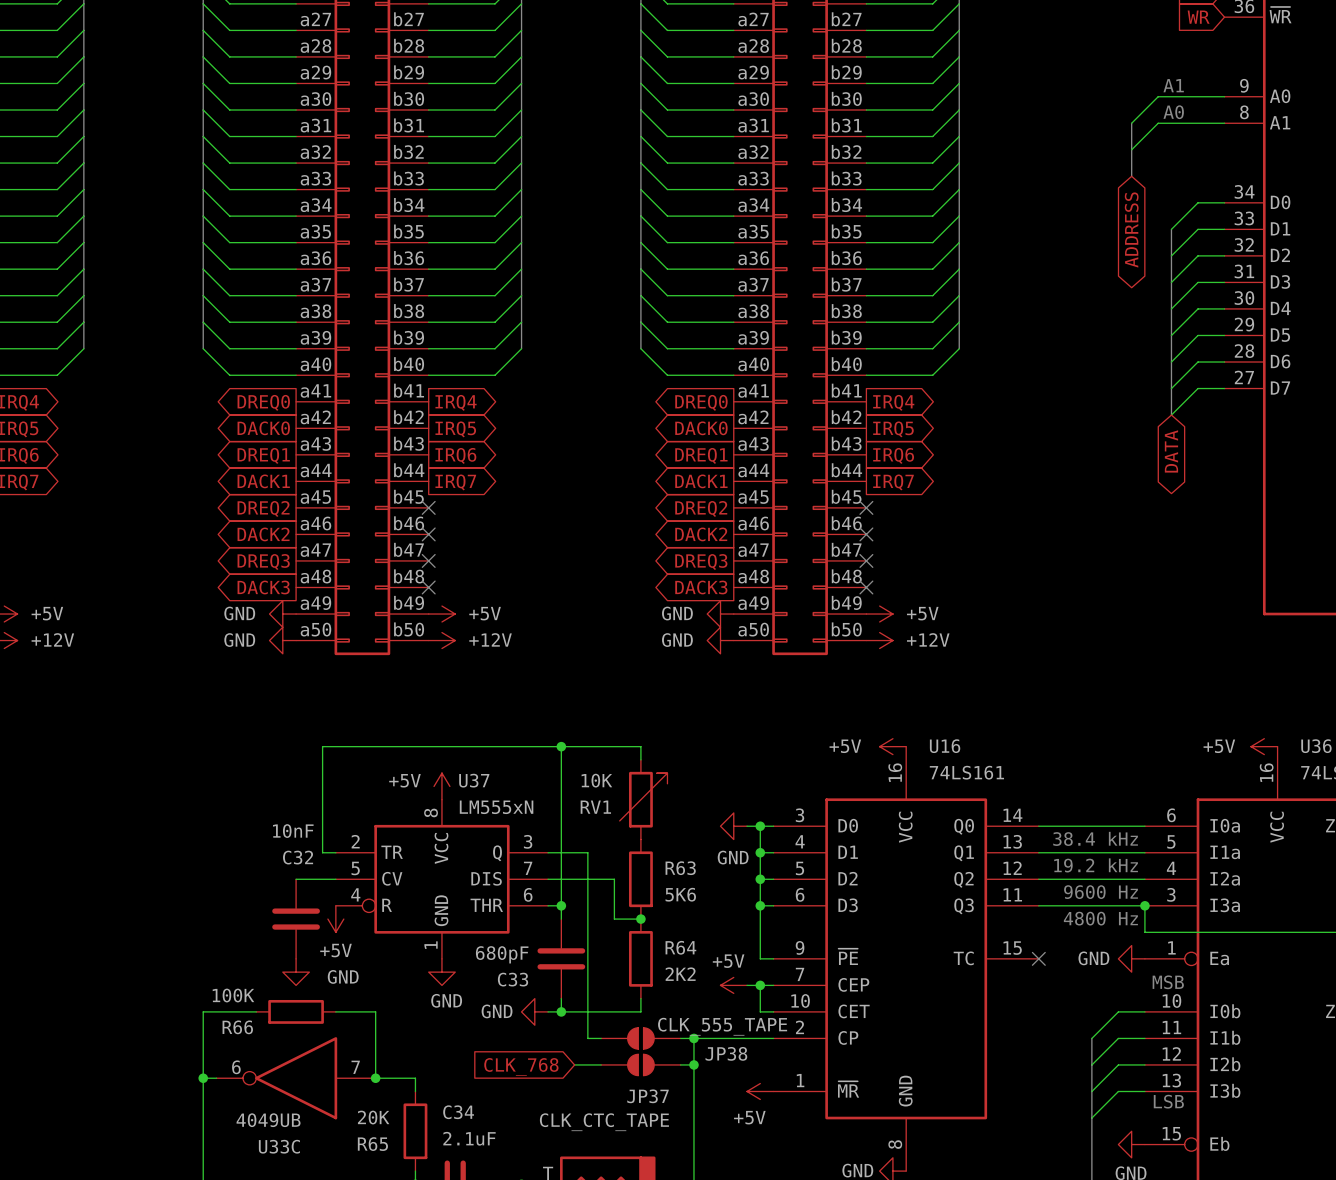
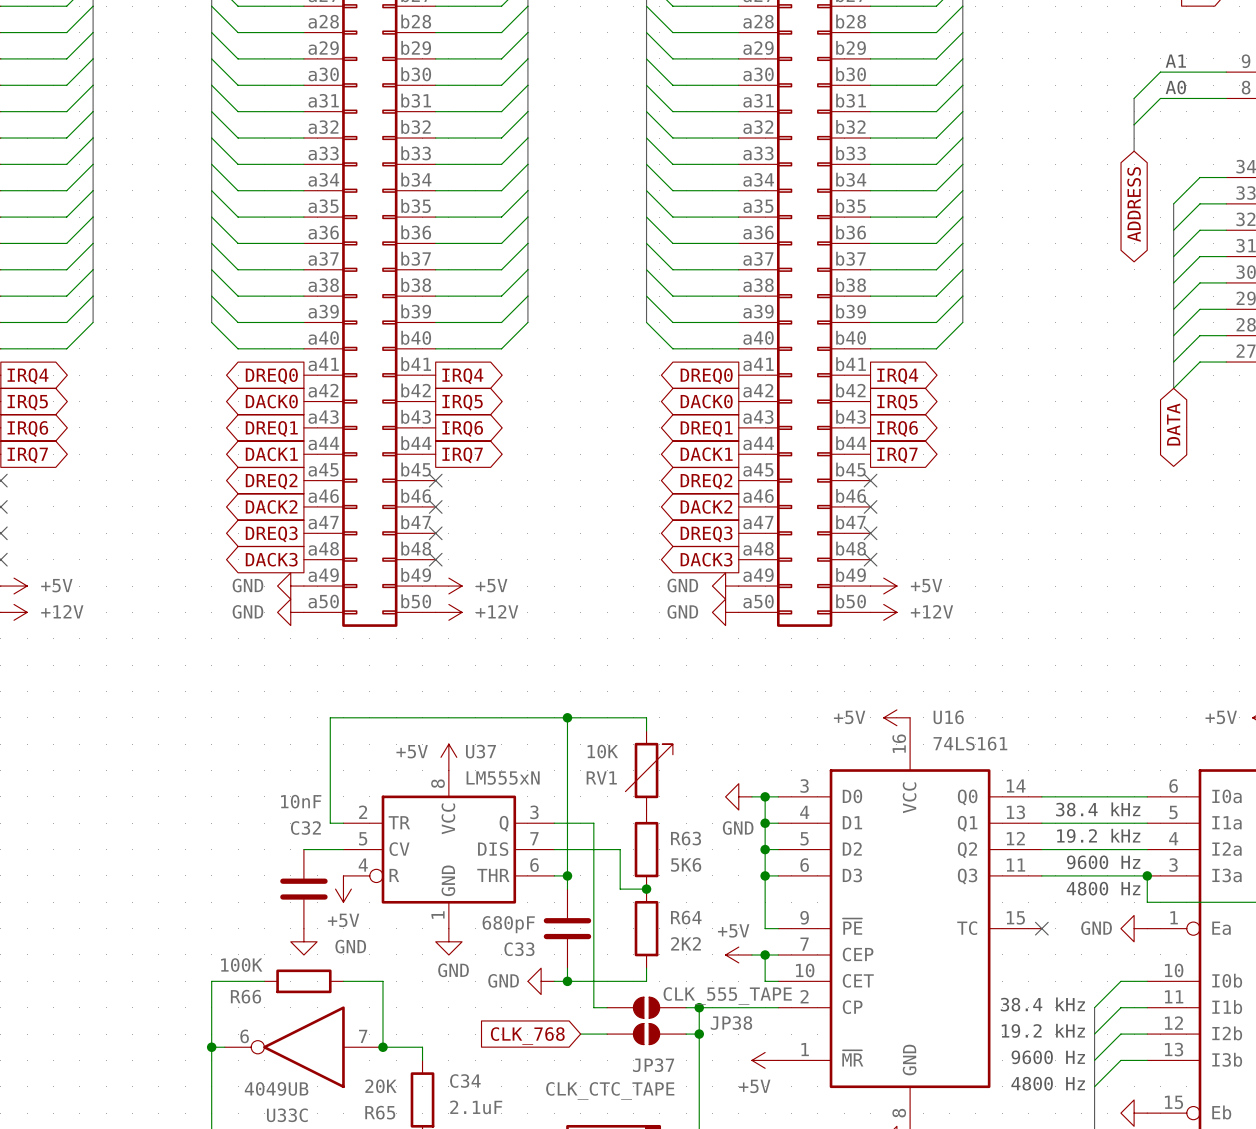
text: MSB (1168, 982) -> none
text: none -> 38.4 kHz (1042, 1004)
text: none -> 19.2 kHz (1043, 1030)
text: none -> 9600 Hz (1048, 1057)
text: LSB (1168, 1101) -> none
text: none -> 4800 Hz (1048, 1083)

